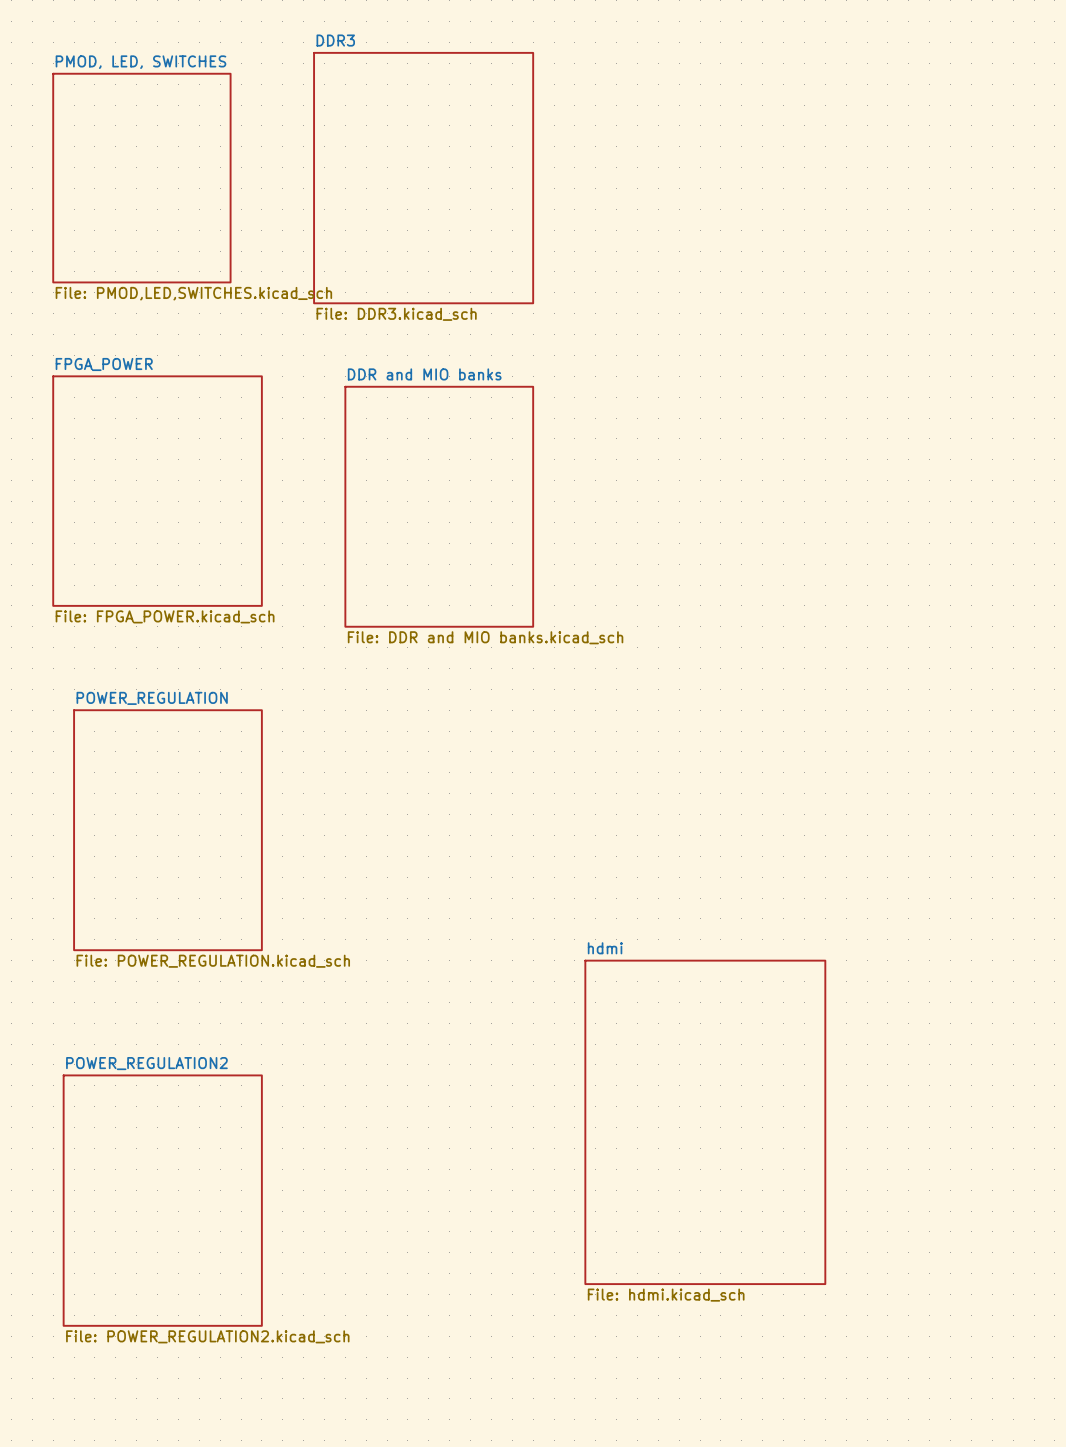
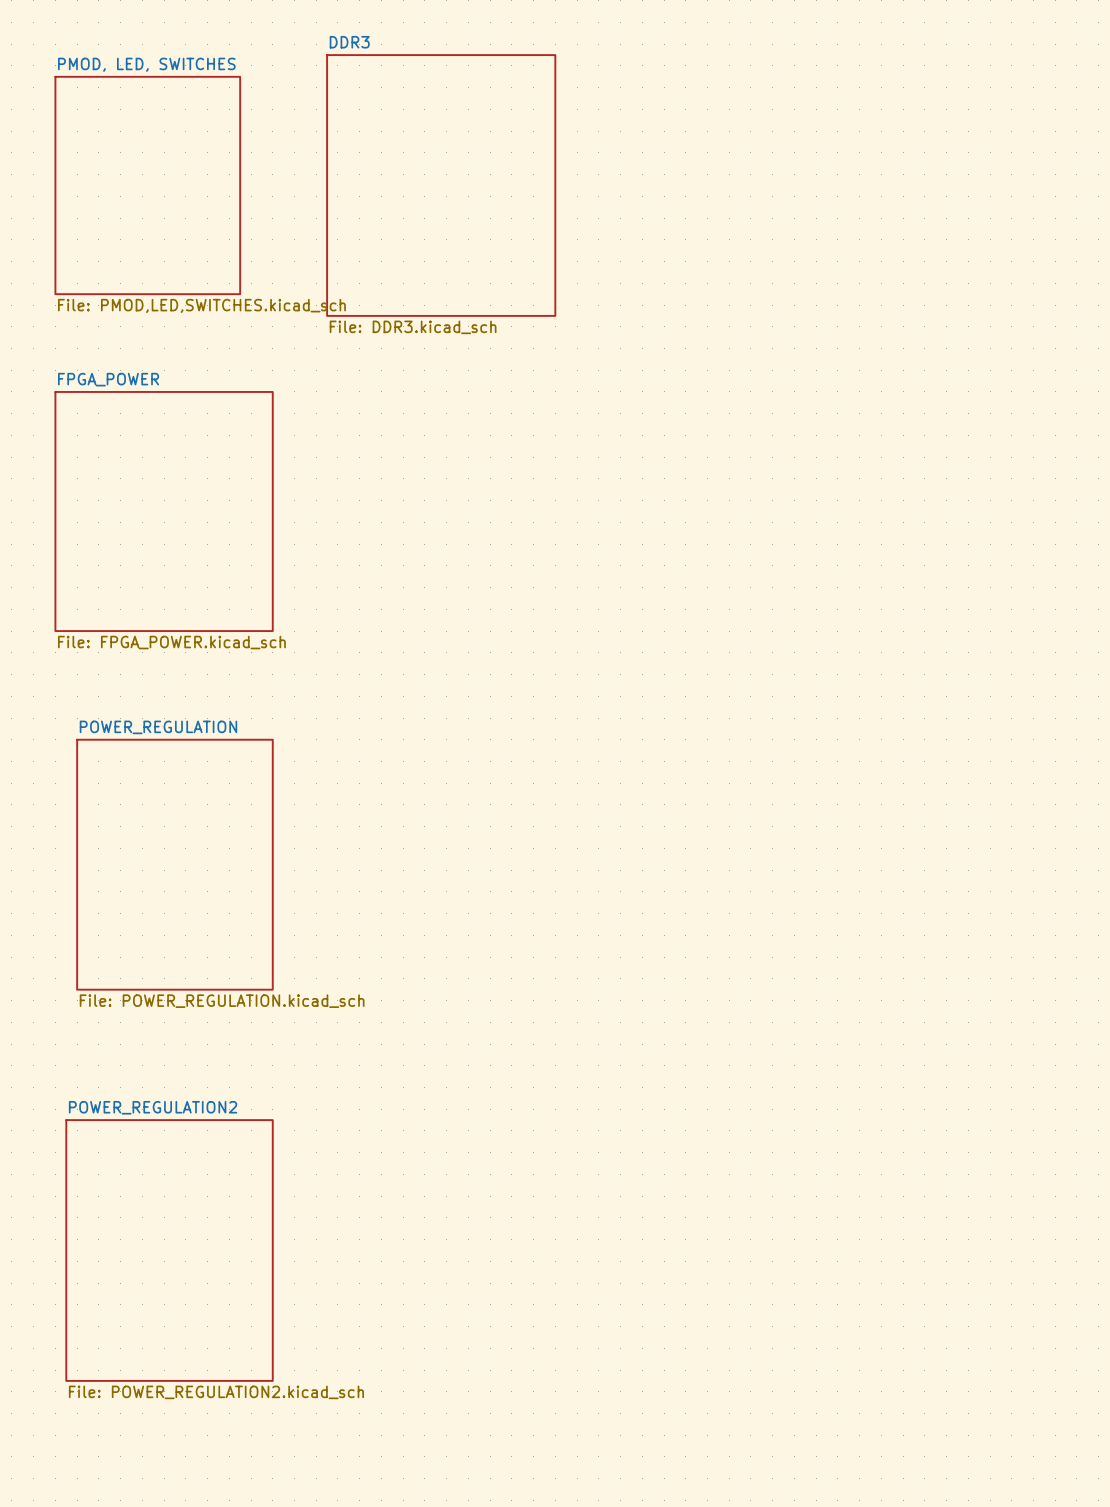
sheet DDR and MIO banks: File: DDR and MIO banks.kicad_sch (439, 506) -> none
sheet hdmi: File: hdmi.kicad_sch (705, 1122) -> none

